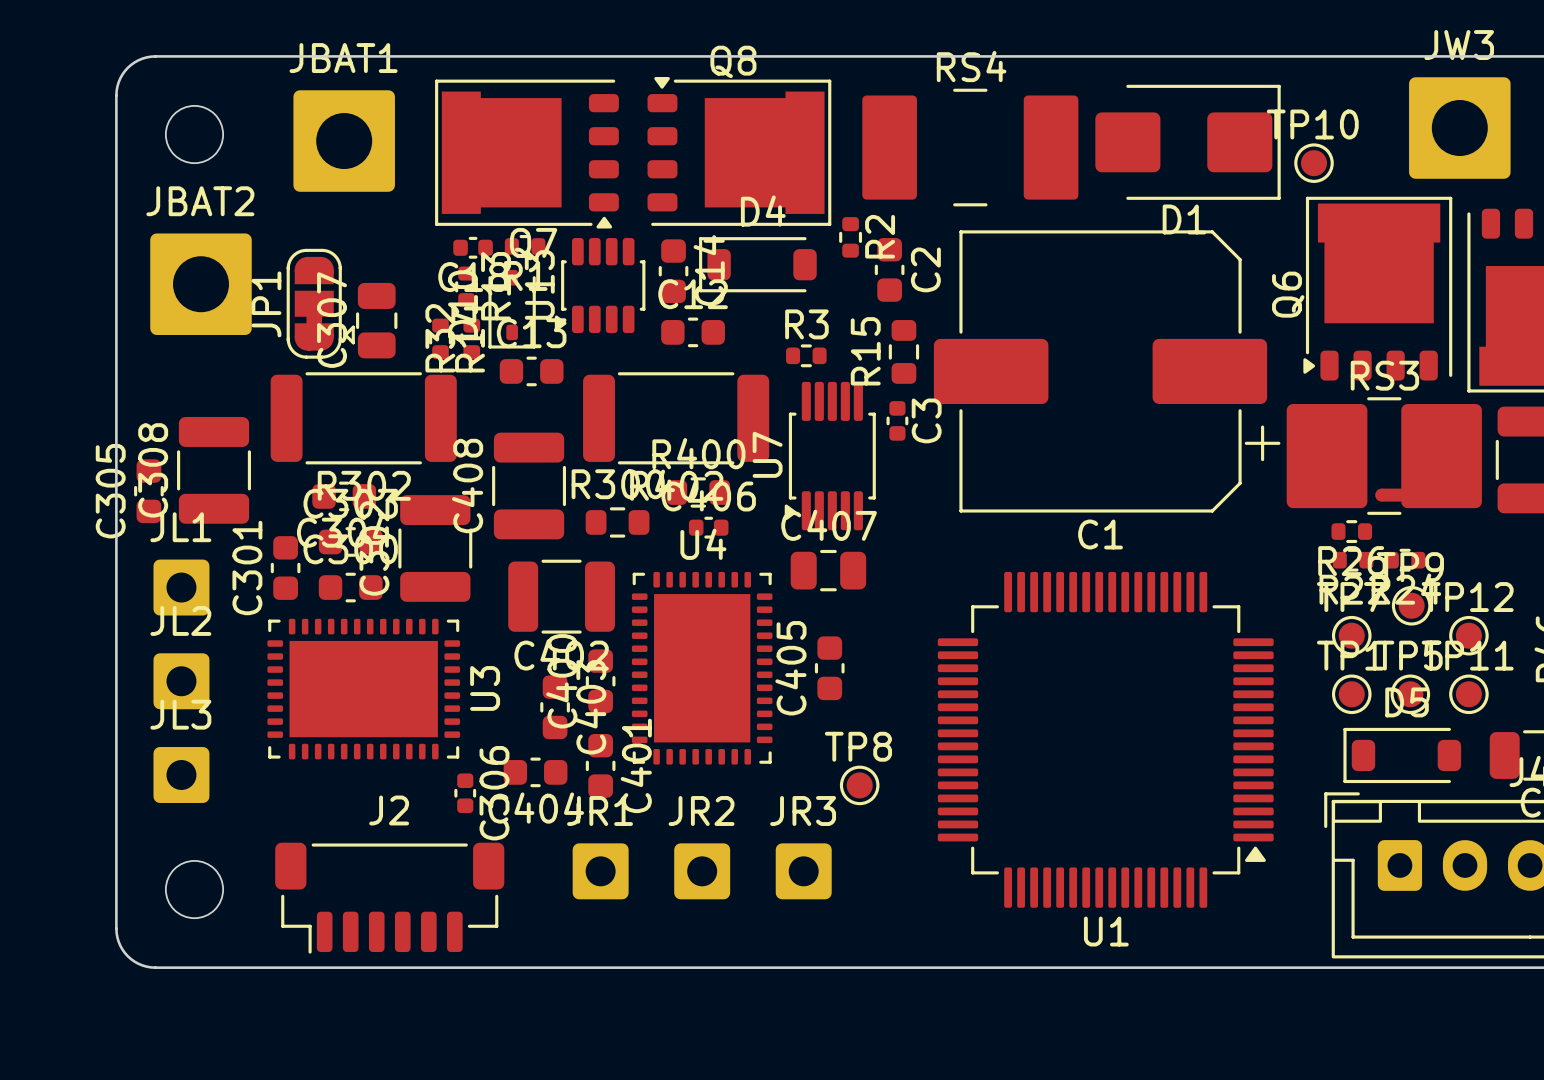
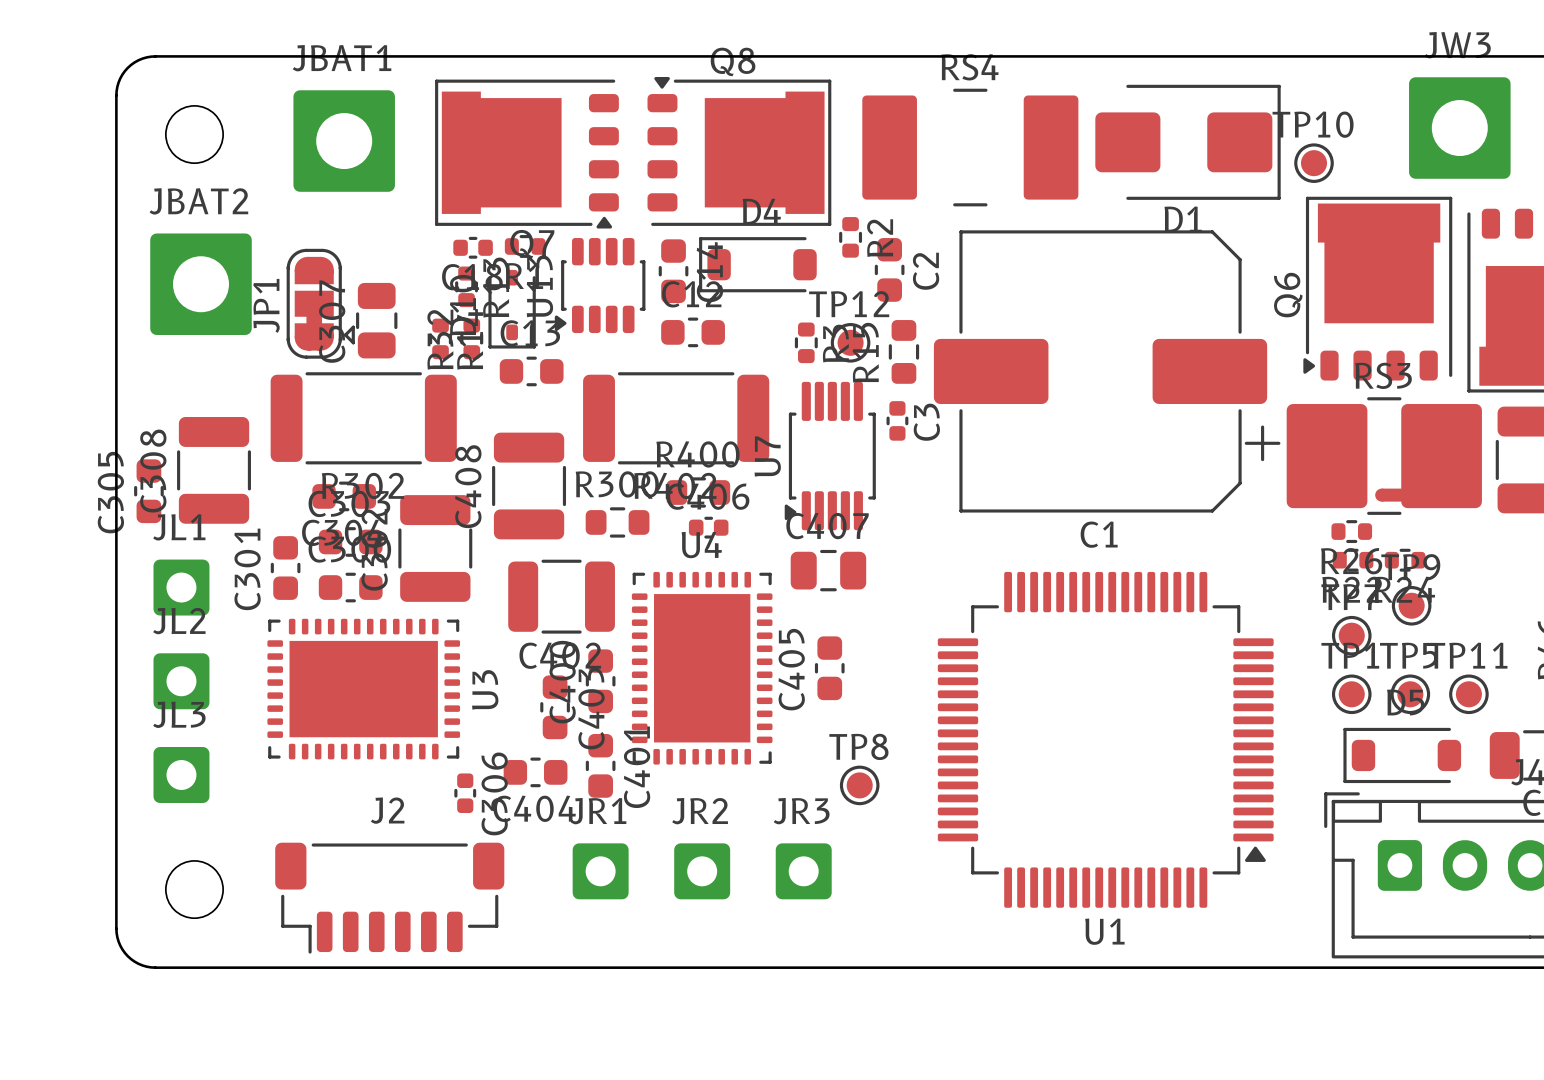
R3 rotation: 0° (806, 355) -> 90° clockwise (806, 342)
TP12 position: (1468, 635) -> (850, 342)

